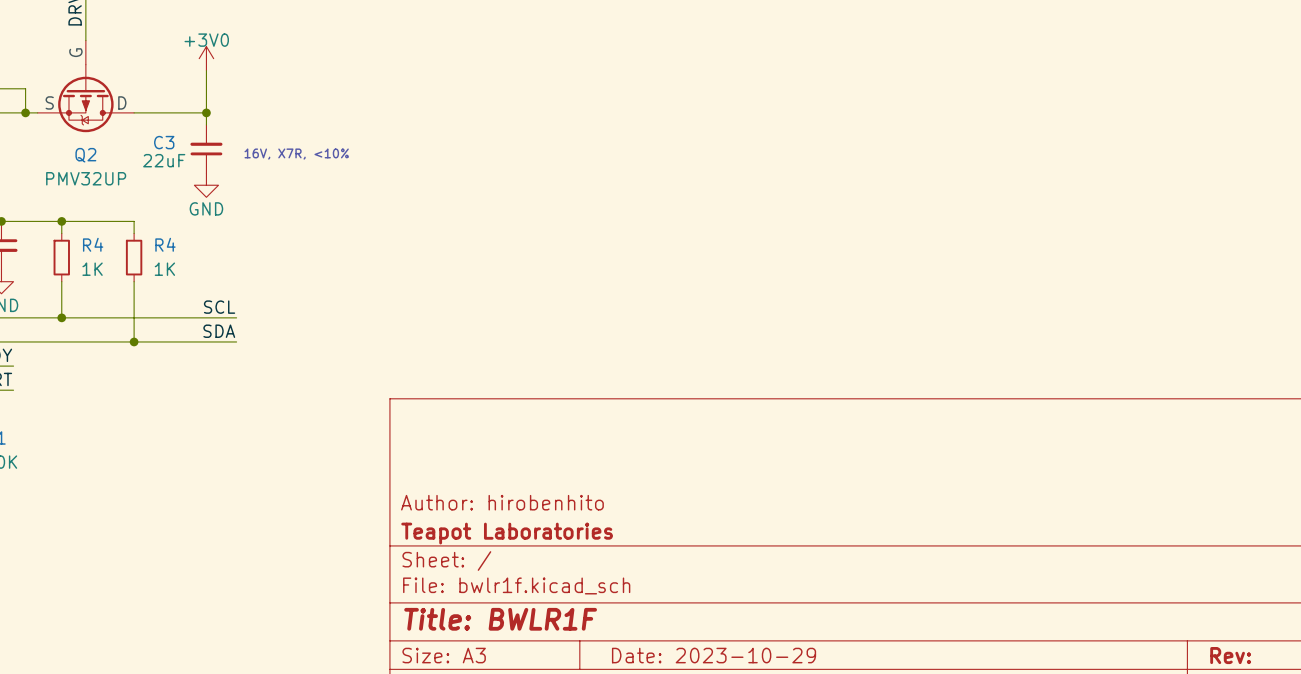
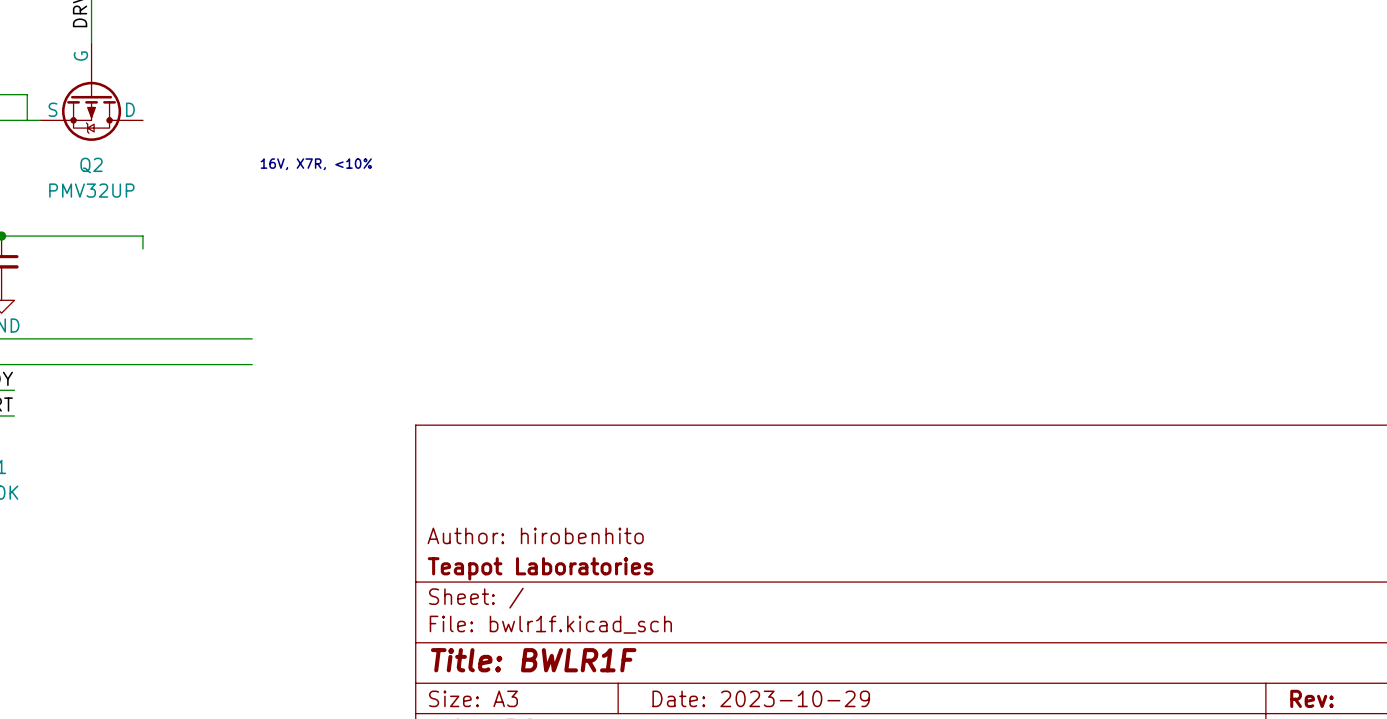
power symbol: +3V0 (206, 58) -> none
wire: (206, 70) (206, 124) -> none
junction: (25, 112) -> none
wire: (134, 112) (206, 112) -> none
junction: (206, 112) -> none
C3: 22uF (206, 149) -> none
power symbol: GND (206, 185) -> none
wire: (61, 221) (61, 233) -> none
junction: (61, 221) -> none
R4: 1K (61, 257) -> none
R4: 1K (134, 257) -> none
wire: (61, 281) (61, 317) -> none
wire: (134, 281) (134, 341) -> none
label: SCL (219, 307) -> none
junction: (61, 317) -> none
label: SDA (219, 331) -> none
junction: (134, 341) -> none

